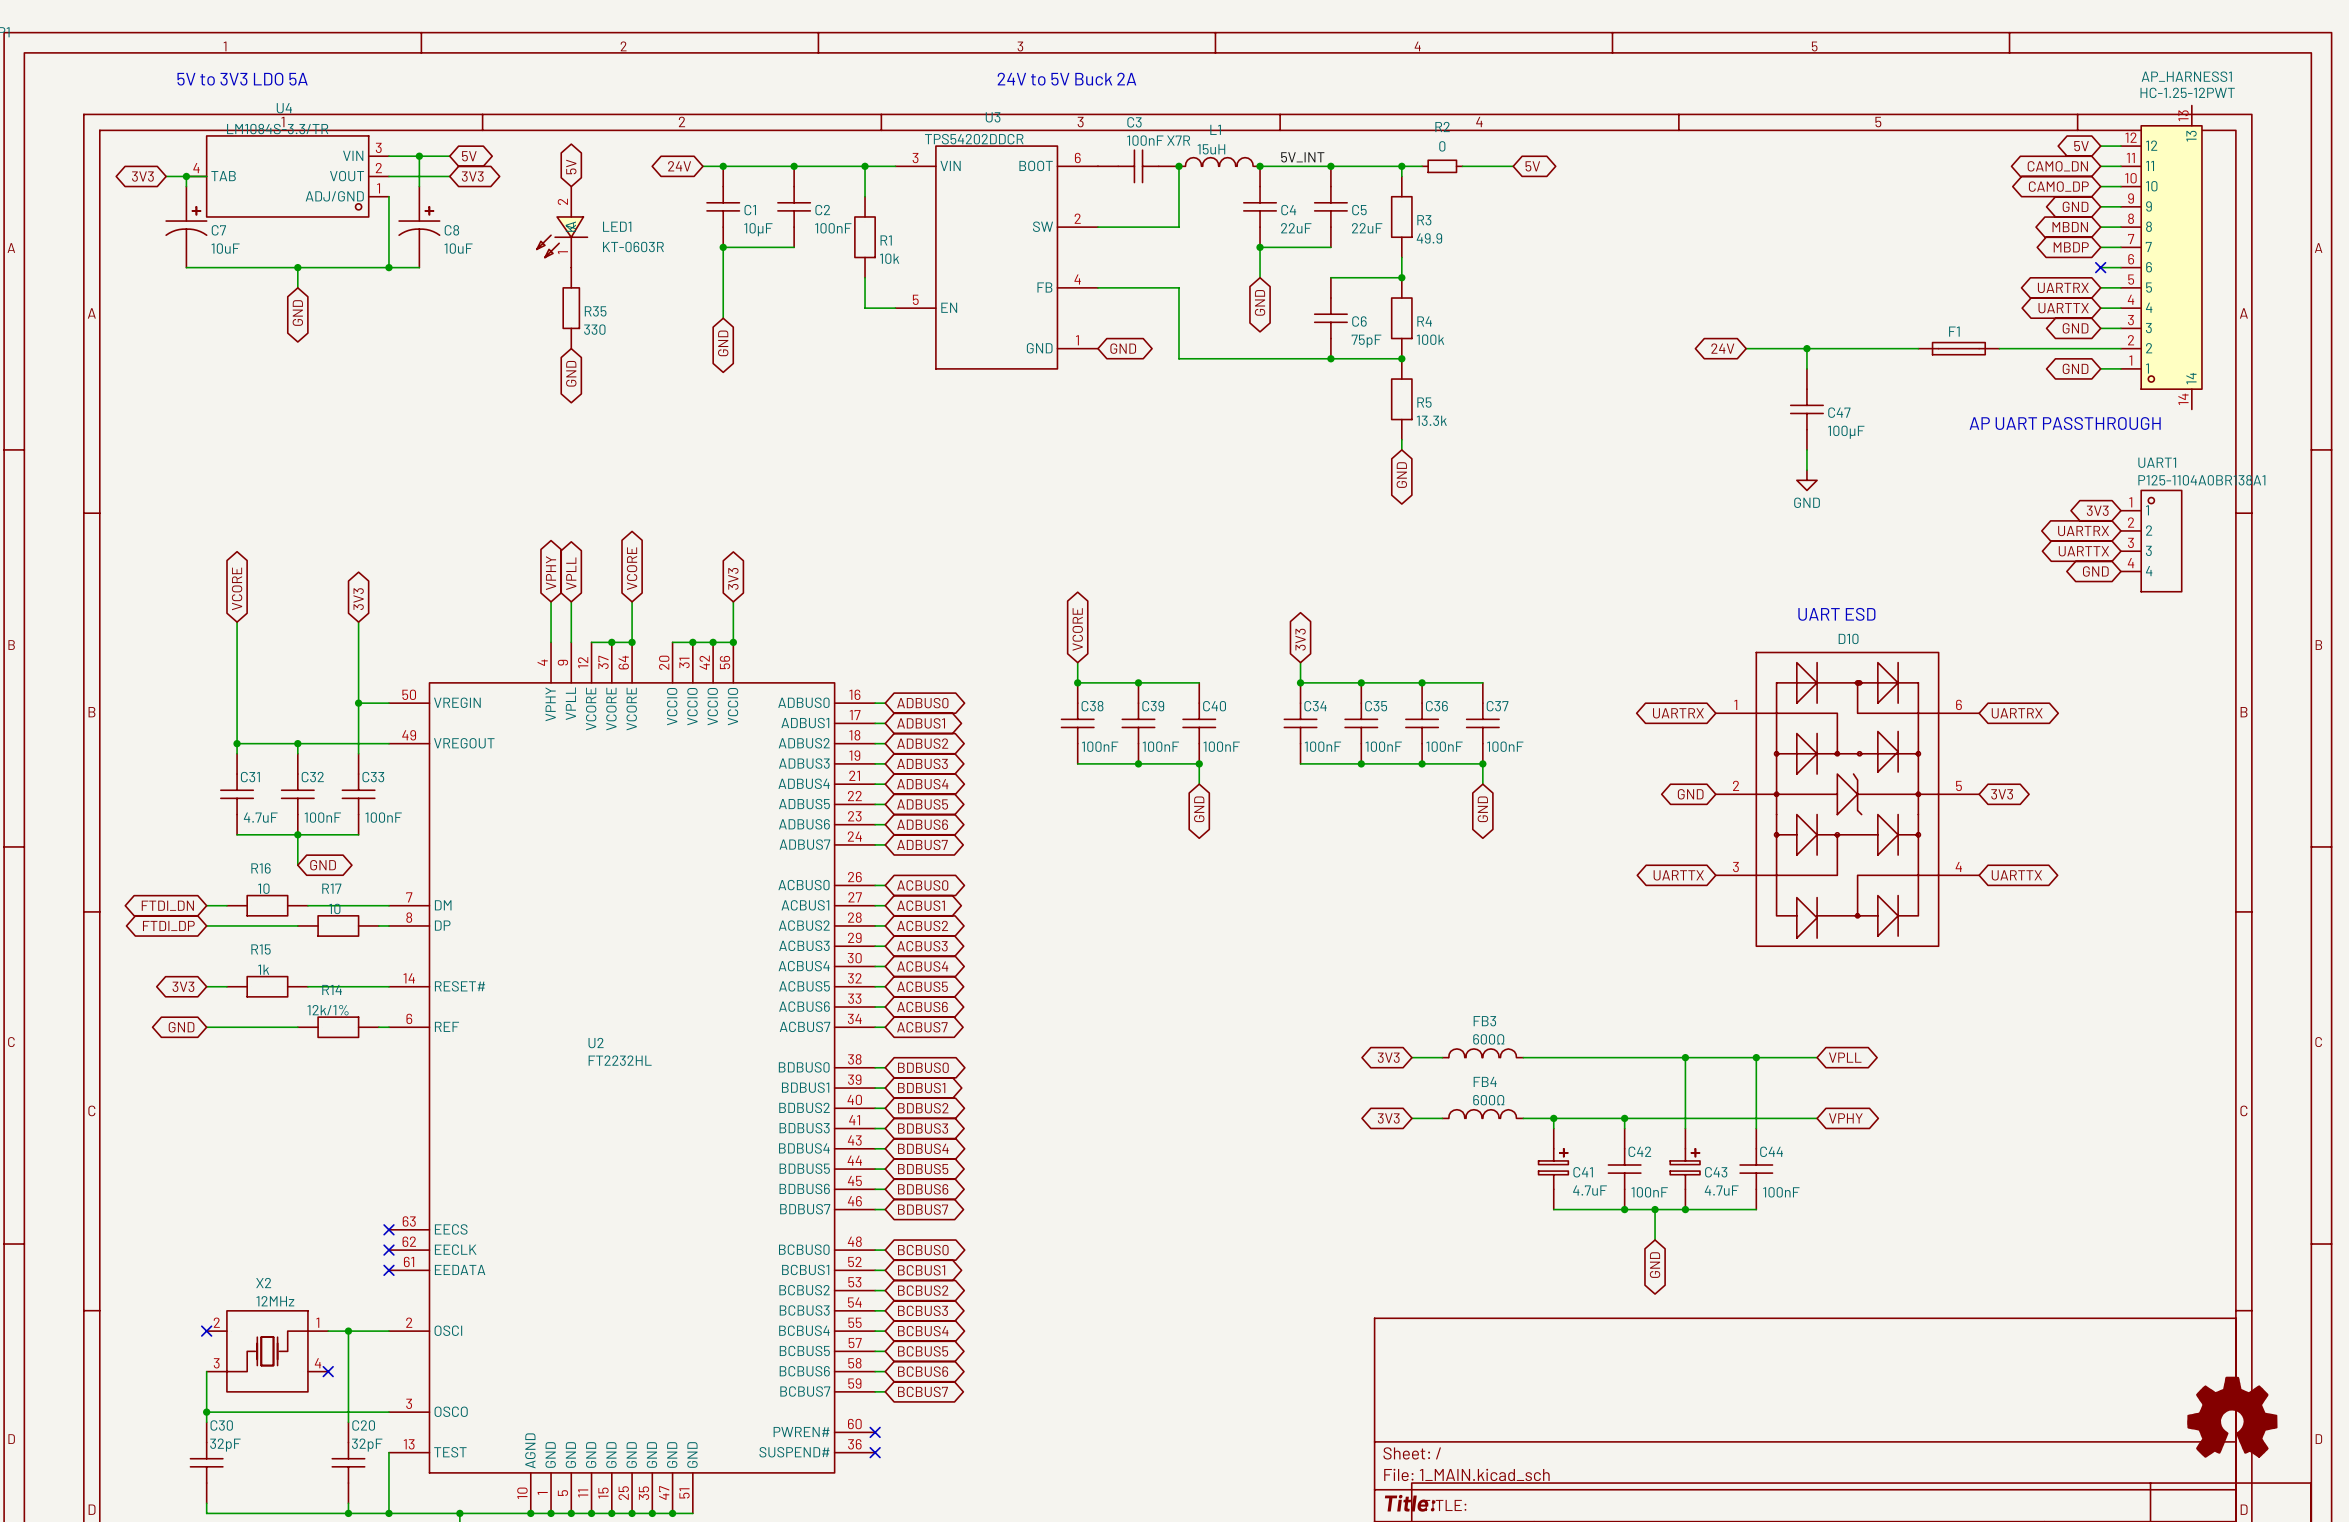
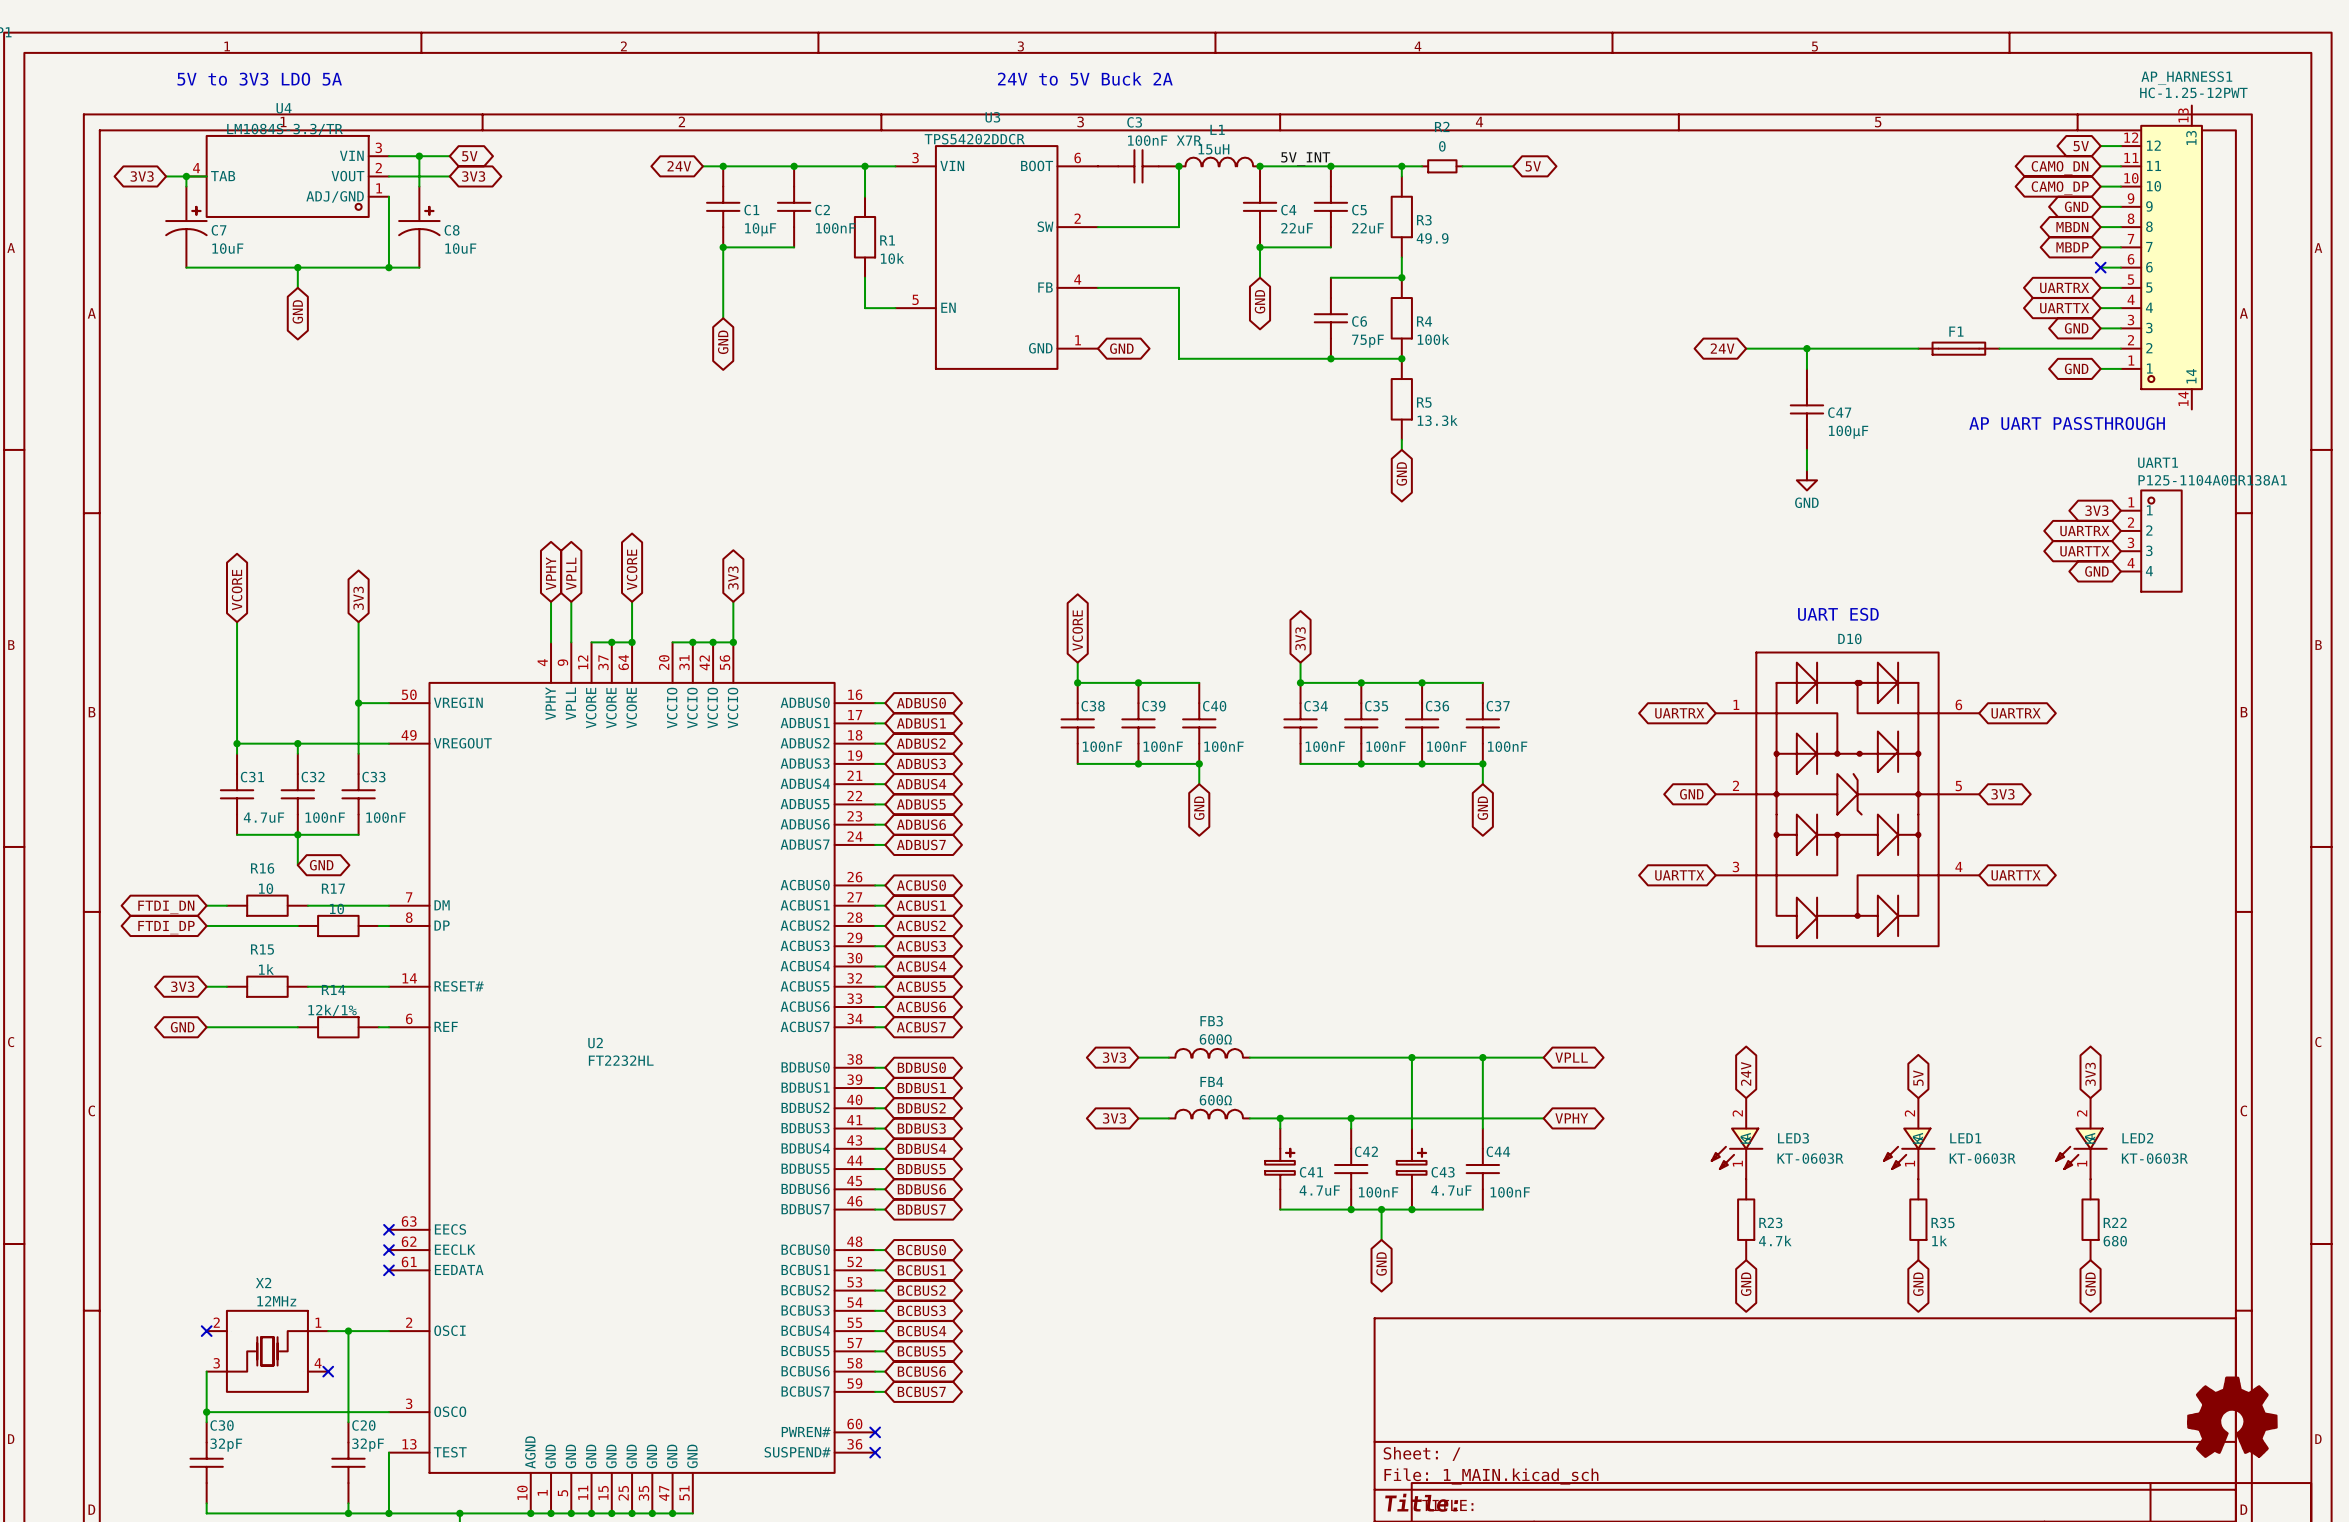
global label: 5V (571, 166) -> none
LED1 position: (562, 227) -> (1909, 1138)
R35 position: (571, 308) -> (1918, 1219)
R35 value: 330 (594, 329) -> 1k (1939, 1240)
global label: GND (571, 373) -> none
FB3 position: (1482, 1053) -> (1209, 1053)
global label: none -> 3V3 (1114, 1057)
wire: none -> (1138, 1057) (1168, 1057)
wire: none -> (1249, 1057) (1411, 1057) (1411, 1128)
global label: 3V3 (1388, 1057) -> none
junction: none -> (1411, 1057)
wire: none -> (1442, 1057) (1523, 1057)
wire: none -> (1482, 1057) (1482, 1128)
junction: none -> (1482, 1057)
wire: (1543, 1057) (1817, 1057) -> none
global label: none -> VPLL (1571, 1057)
wire: (1685, 1057) (1685, 1128) -> none
junction: (1685, 1057) -> none
wire: (1756, 1057) (1756, 1128) -> none
junction: (1756, 1057) -> none
global label: VPLL (1845, 1057) -> none
global label: none -> 24V (1746, 1073)
global label: none -> 3V3 (2090, 1074)
global label: none -> 5V (1918, 1078)
FB4 position: (1482, 1114) -> (1209, 1114)
global label: none -> 3V3 (1114, 1118)
wire: none -> (1138, 1118) (1168, 1118)
wire: none -> (1249, 1118) (1411, 1118)
wire: none -> (1280, 1118) (1280, 1128)
junction: none -> (1280, 1118)
wire: none -> (1351, 1118) (1351, 1128)
junction: none -> (1351, 1118)
global label: 3V3 (1388, 1118) -> none
wire: none -> (1442, 1118) (1523, 1118)
wire: (1543, 1118) (1817, 1118) -> none
wire: (1553, 1118) (1553, 1128) -> none
junction: (1553, 1118) -> none
global label: none -> VPHY (1571, 1118)
wire: (1624, 1118) (1624, 1128) -> none
junction: (1624, 1118) -> none
global label: VPHY (1845, 1118) -> none
LED3: none -> KT-0603R (1737, 1138)
LED2: none -> KT-0603R (2081, 1138)
C41 position: (1553, 1169) -> (1279, 1169)
C42 position: (1624, 1169) -> (1351, 1169)
C43 position: (1685, 1169) -> (1411, 1169)
C44 position: (1756, 1169) -> (1482, 1169)
wire: none -> (1280, 1209) (1482, 1209)
junction: none -> (1351, 1209)
wire: none -> (1381, 1209) (1381, 1239)
junction: none -> (1381, 1209)
junction: none -> (1411, 1209)
wire: (1553, 1209) (1756, 1209) -> none
junction: (1624, 1209) -> none
wire: (1655, 1209) (1655, 1239) -> none
junction: (1655, 1209) -> none
junction: (1685, 1209) -> none
R23: none -> 4.7k (1746, 1219)
R22: none -> 680 (2090, 1219)
global label: none -> GND (1381, 1263)
global label position: GND (1655, 1265) -> GND (1746, 1284)
global label: none -> GND (1918, 1284)
global label: none -> GND (2090, 1284)

